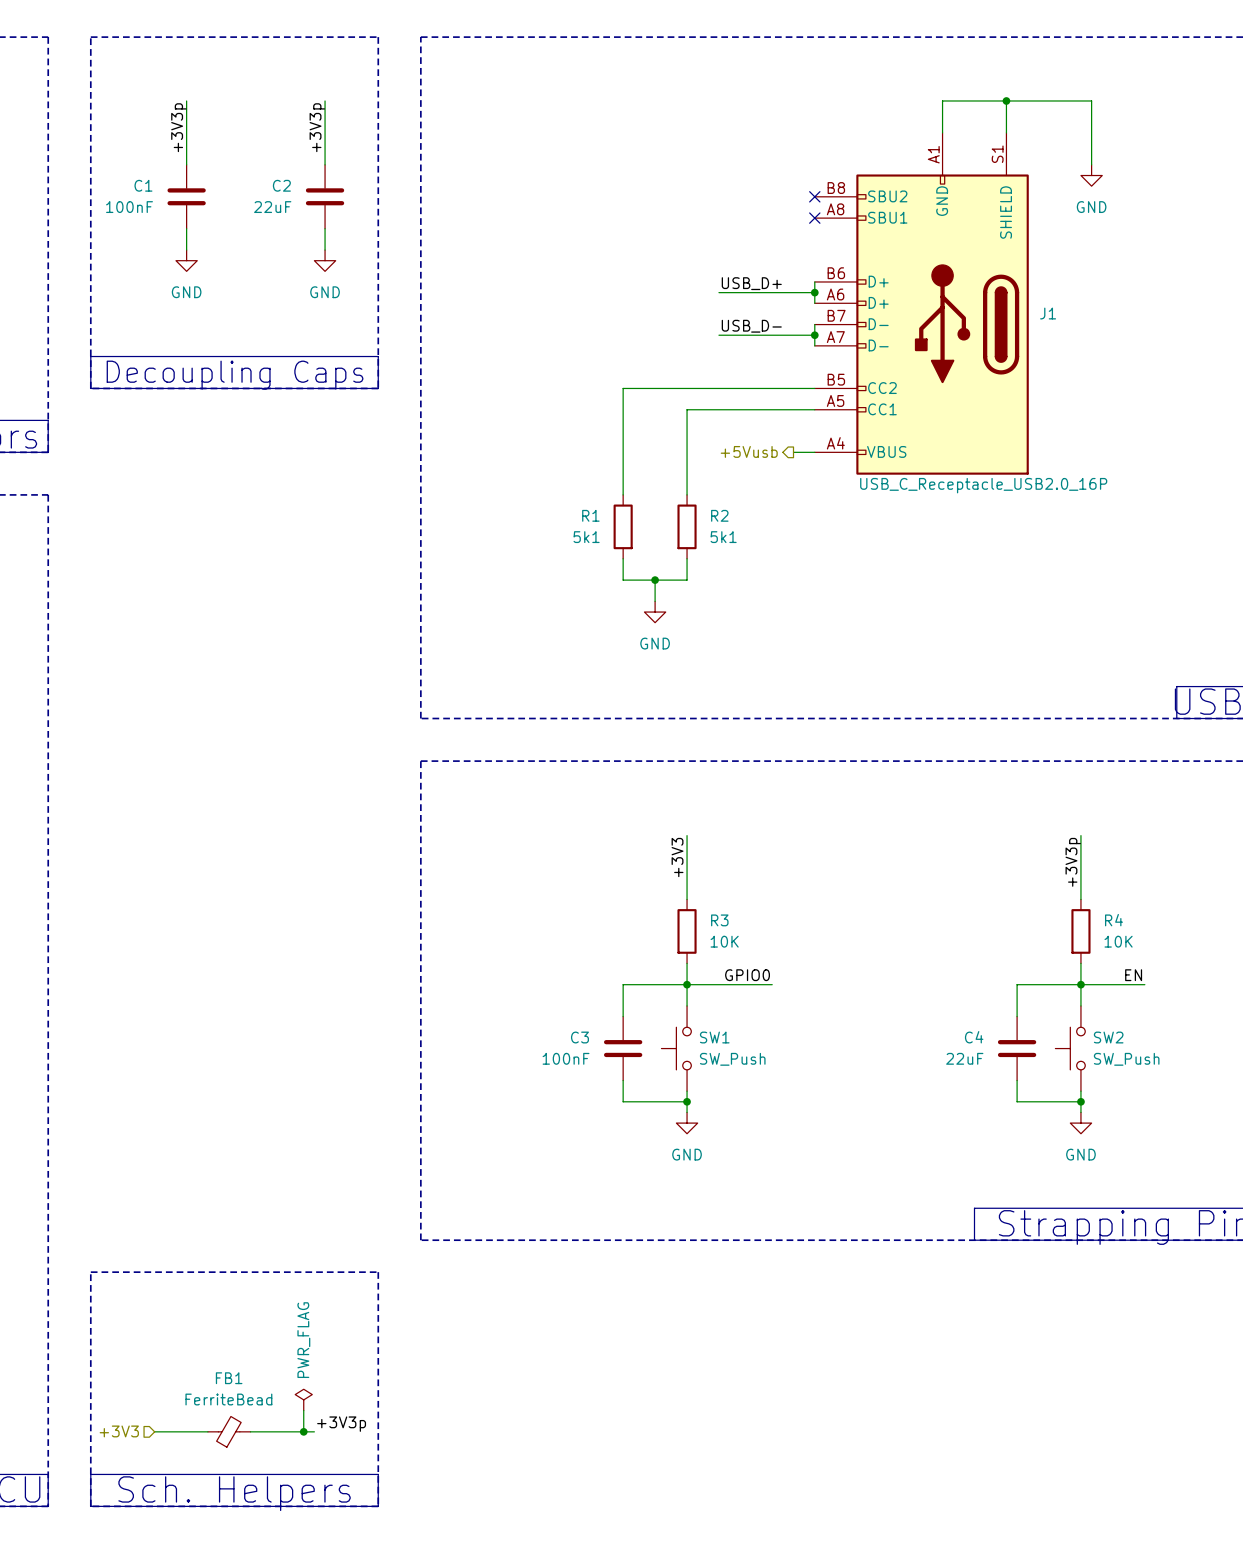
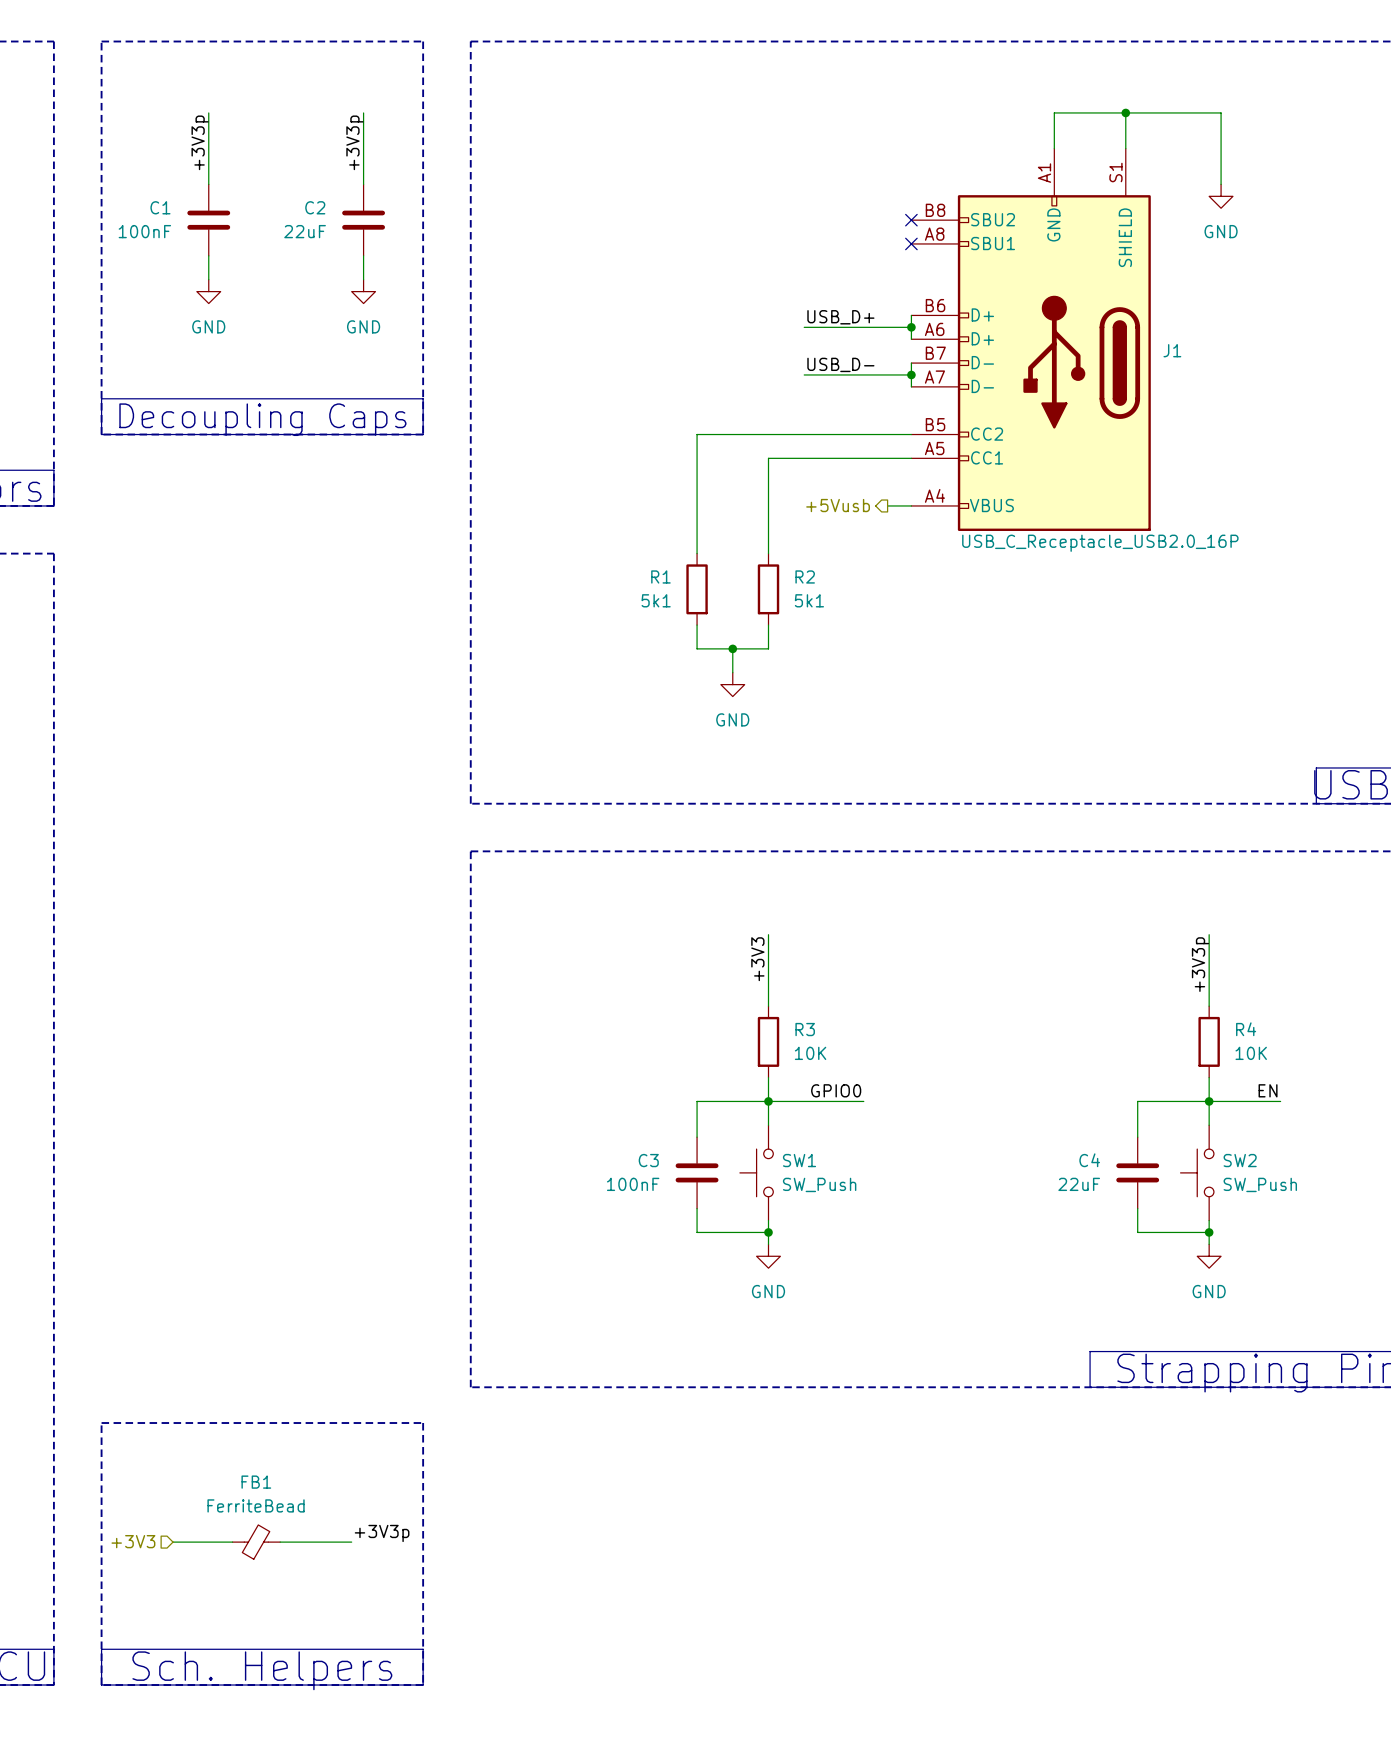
power symbol: PWR_FLAG (303, 1399) -> none
wire: (303, 1410) (303, 1431) -> none
label position: +3V3p (341, 1424) -> +3V3p (382, 1533)
hierarchical label position: +3V3 (119, 1431) -> +3V3 (133, 1541)
wire: (154, 1431) (207, 1431) -> (173, 1542) (232, 1542)
FB1 position: (229, 1431) -> (256, 1542)
wire: (250, 1431) (314, 1431) -> (280, 1542) (351, 1542)
junction: (303, 1431) -> none

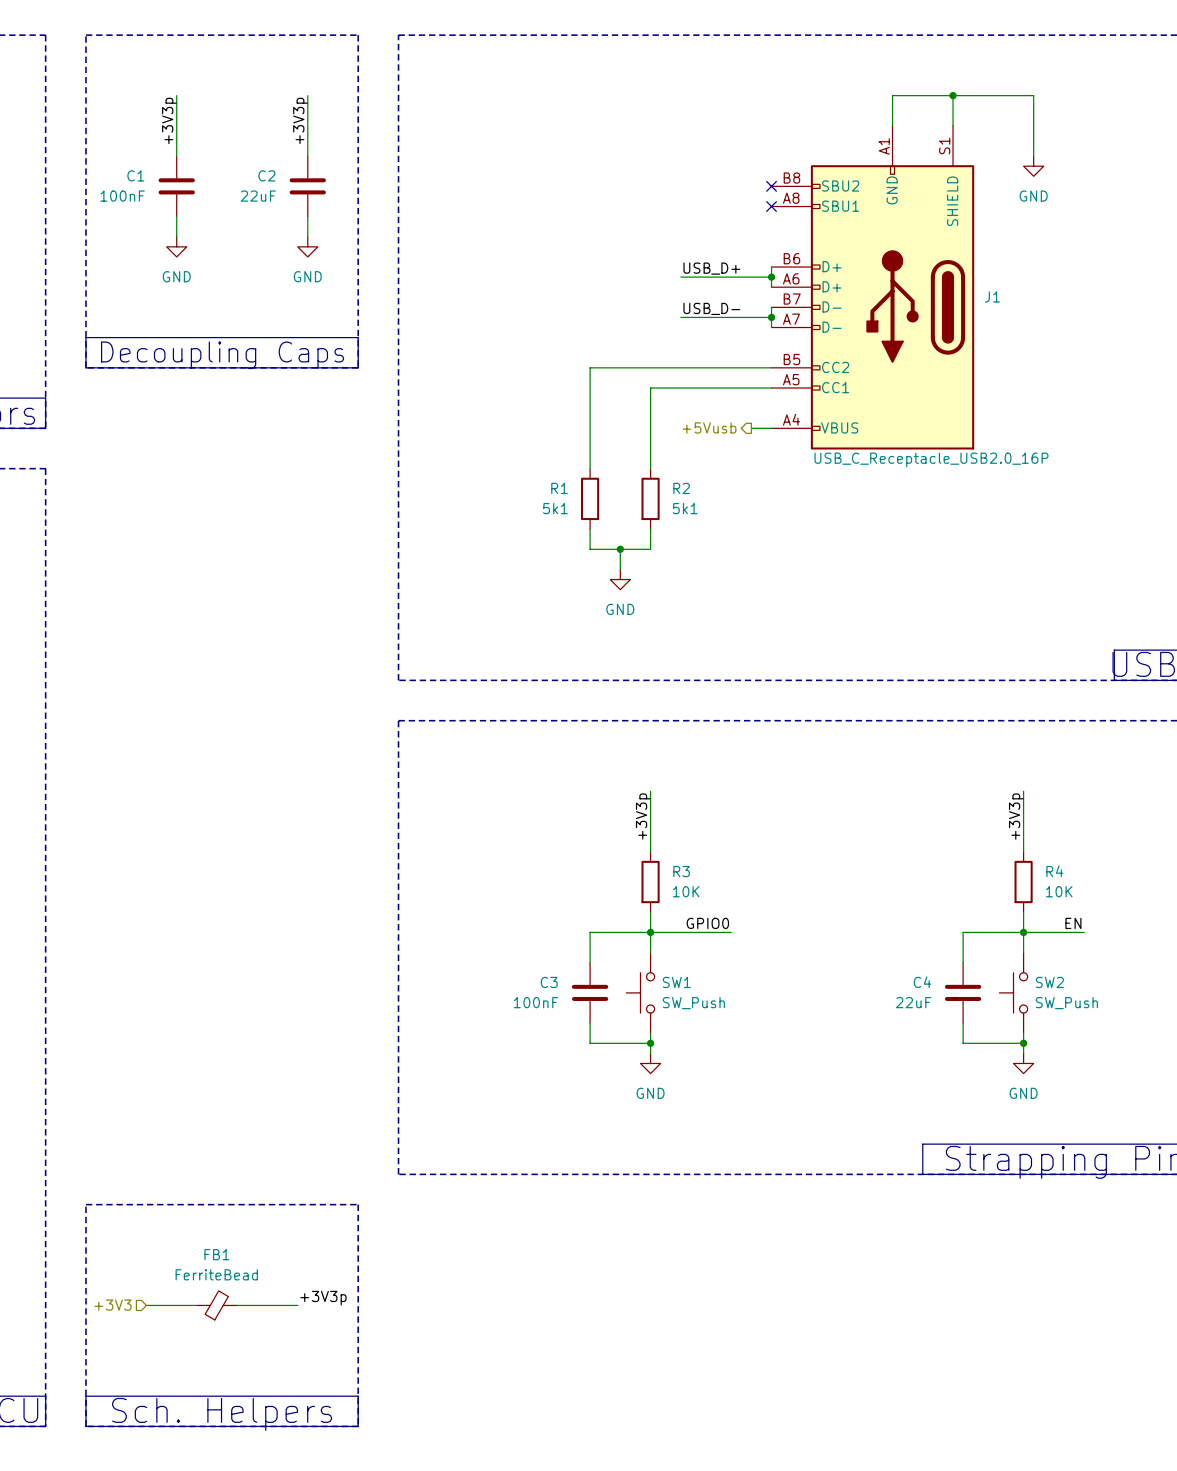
label: +3V3 (757, 959) -> +3V3p (643, 816)

